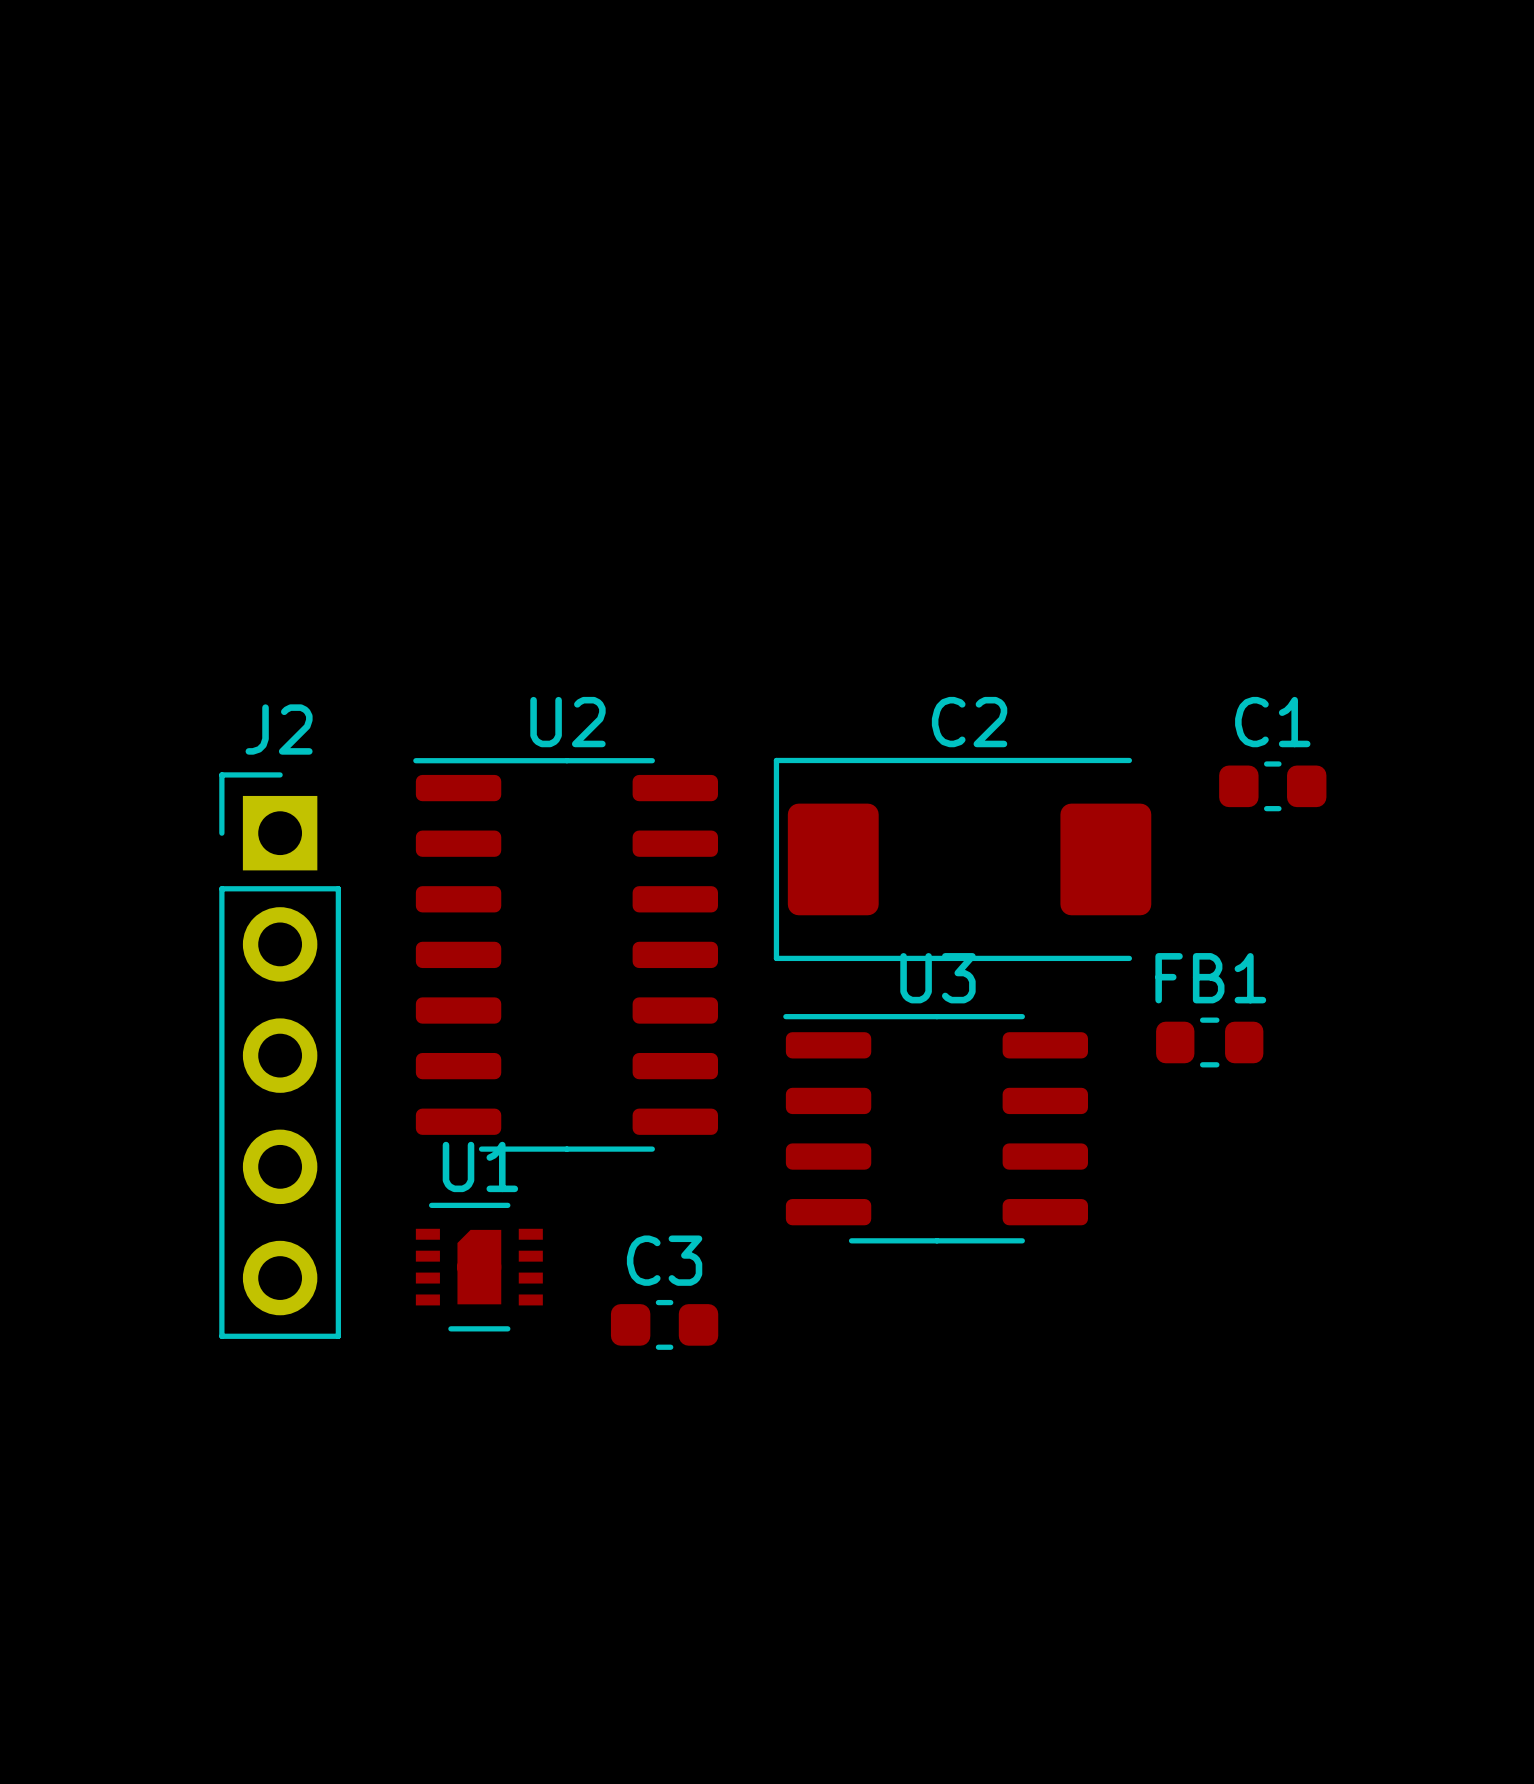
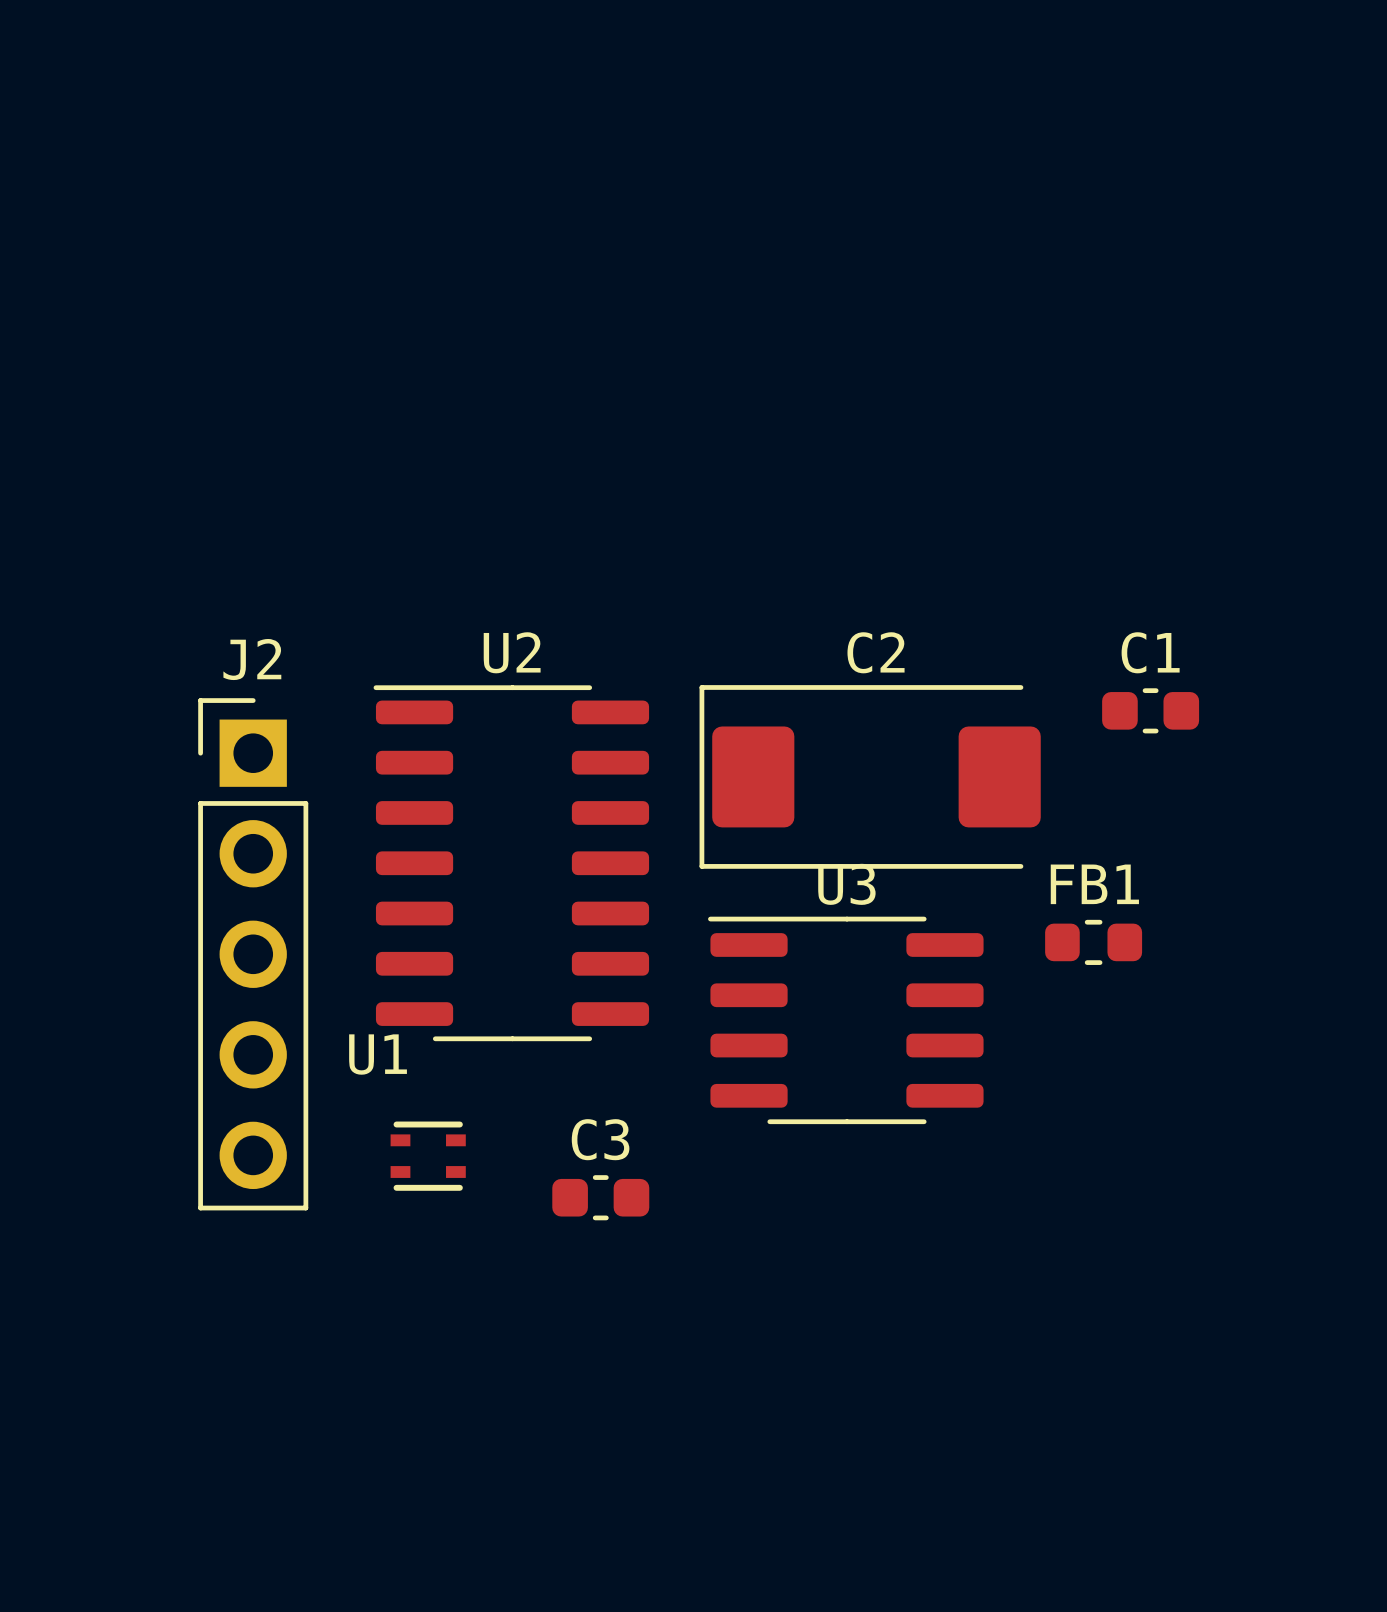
U1 name position: U1 (480, 1166) -> U1 (378, 1054)
U1 footprint: [415, 1202, 543, 1332] -> [390, 1121, 466, 1191]

